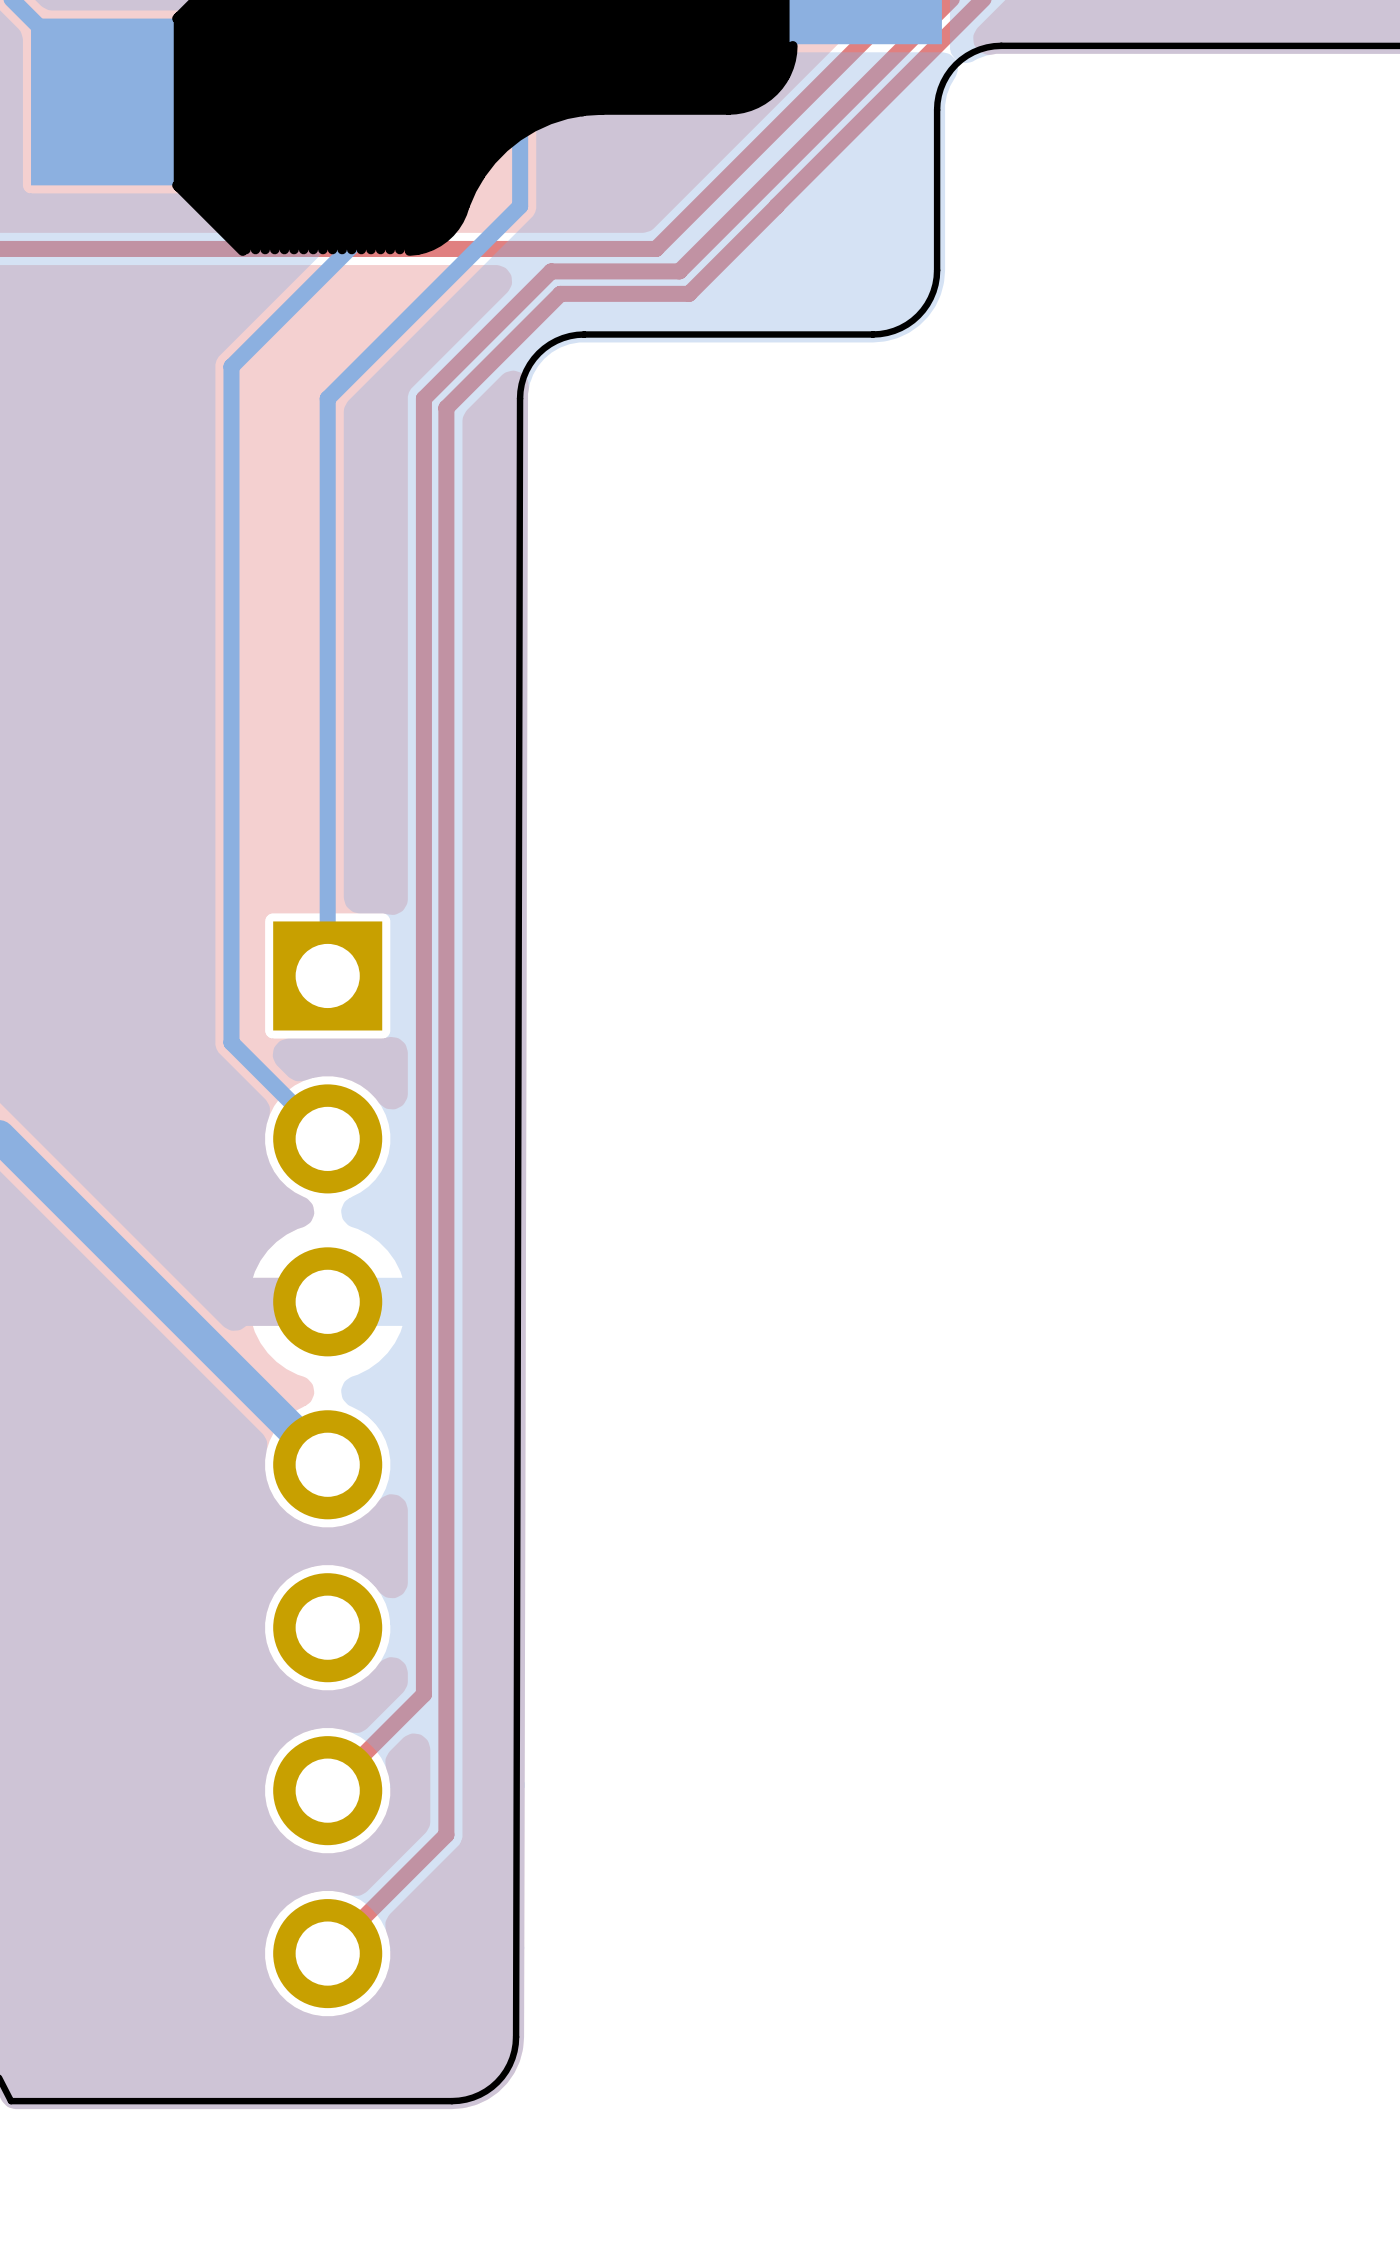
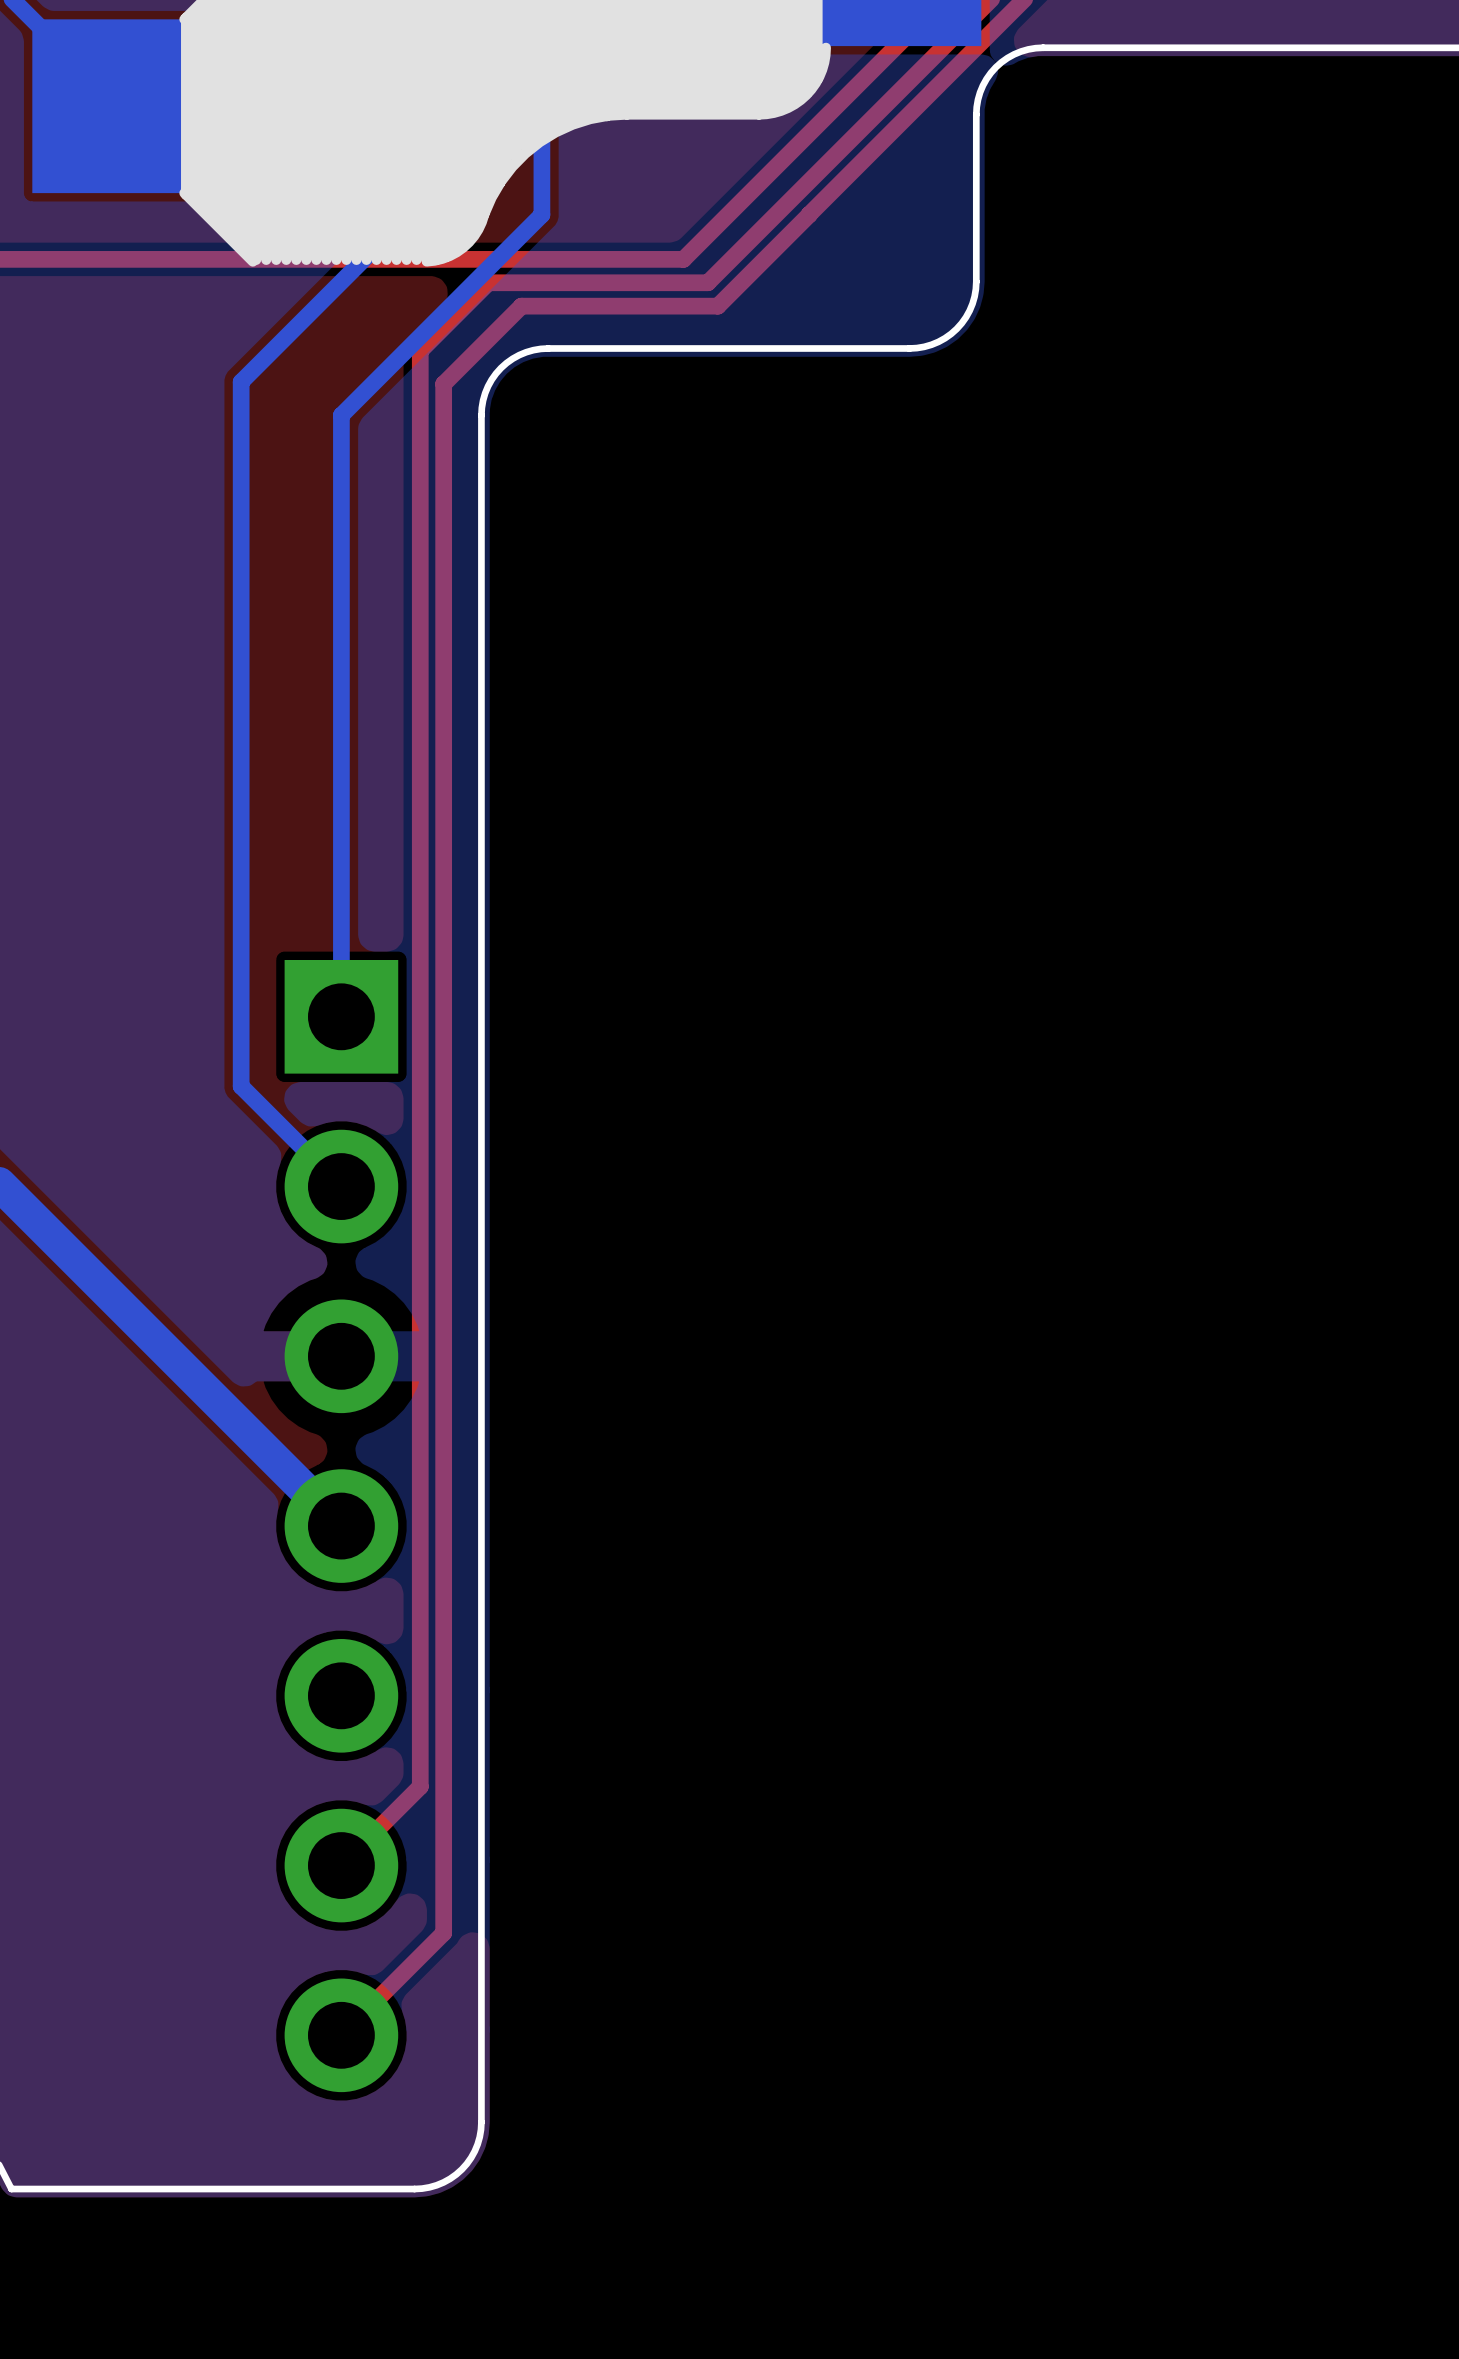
top track: (551, 271) (423, 398) (423, 1694) (403, 1714) -> (574, 282) (488, 282) (420, 350) (420, 1786)
top track: (560, 293) (446, 407) (446, 1834) (425, 1855) -> (583, 306) (521, 306) (443, 384) (443, 1933)
board edge: (584, 334) (563, 338) (550, 344) (538, 353) (529, 364) (523, 377) (520, 398) (515, 2044) (512, 2058) (502, 2076) (491, 2087) (479, 2094) (459, 2100) (397, 2101) -> (608, 348) (540, 348) (519, 355) (501, 368) (491, 379) (485, 393) (481, 407) (481, 2122) (477, 2144) (471, 2157) (461, 2169) (443, 2182) (429, 2187) (414, 2189)

